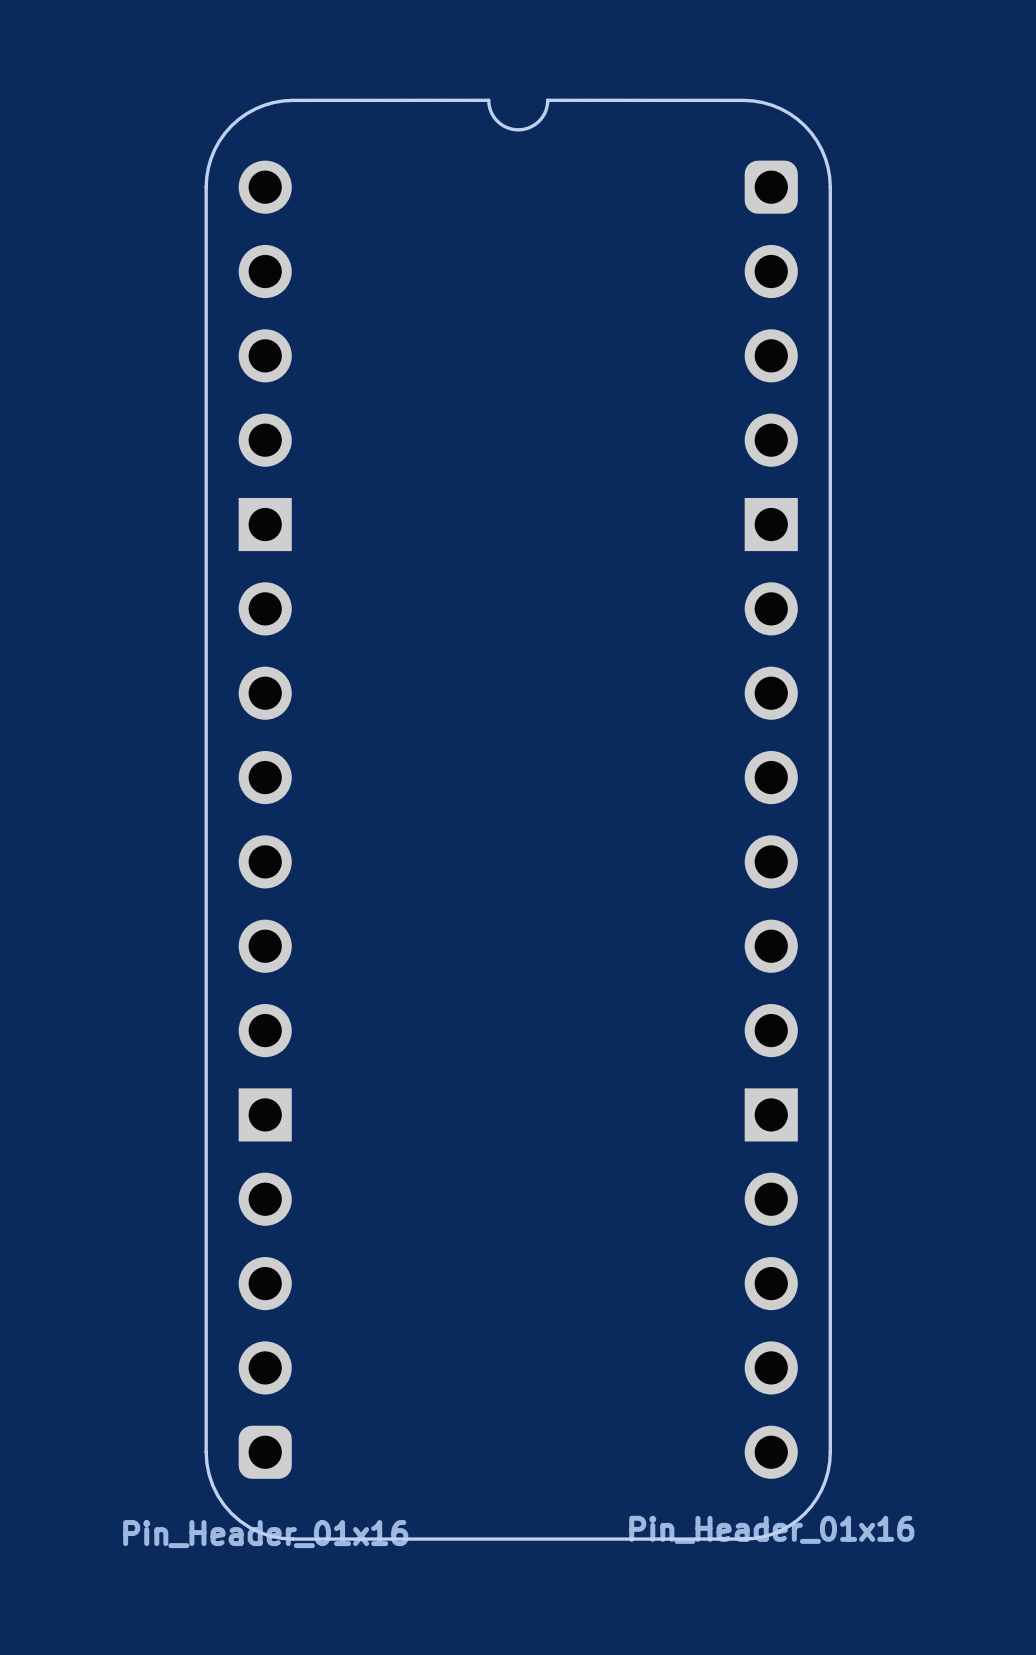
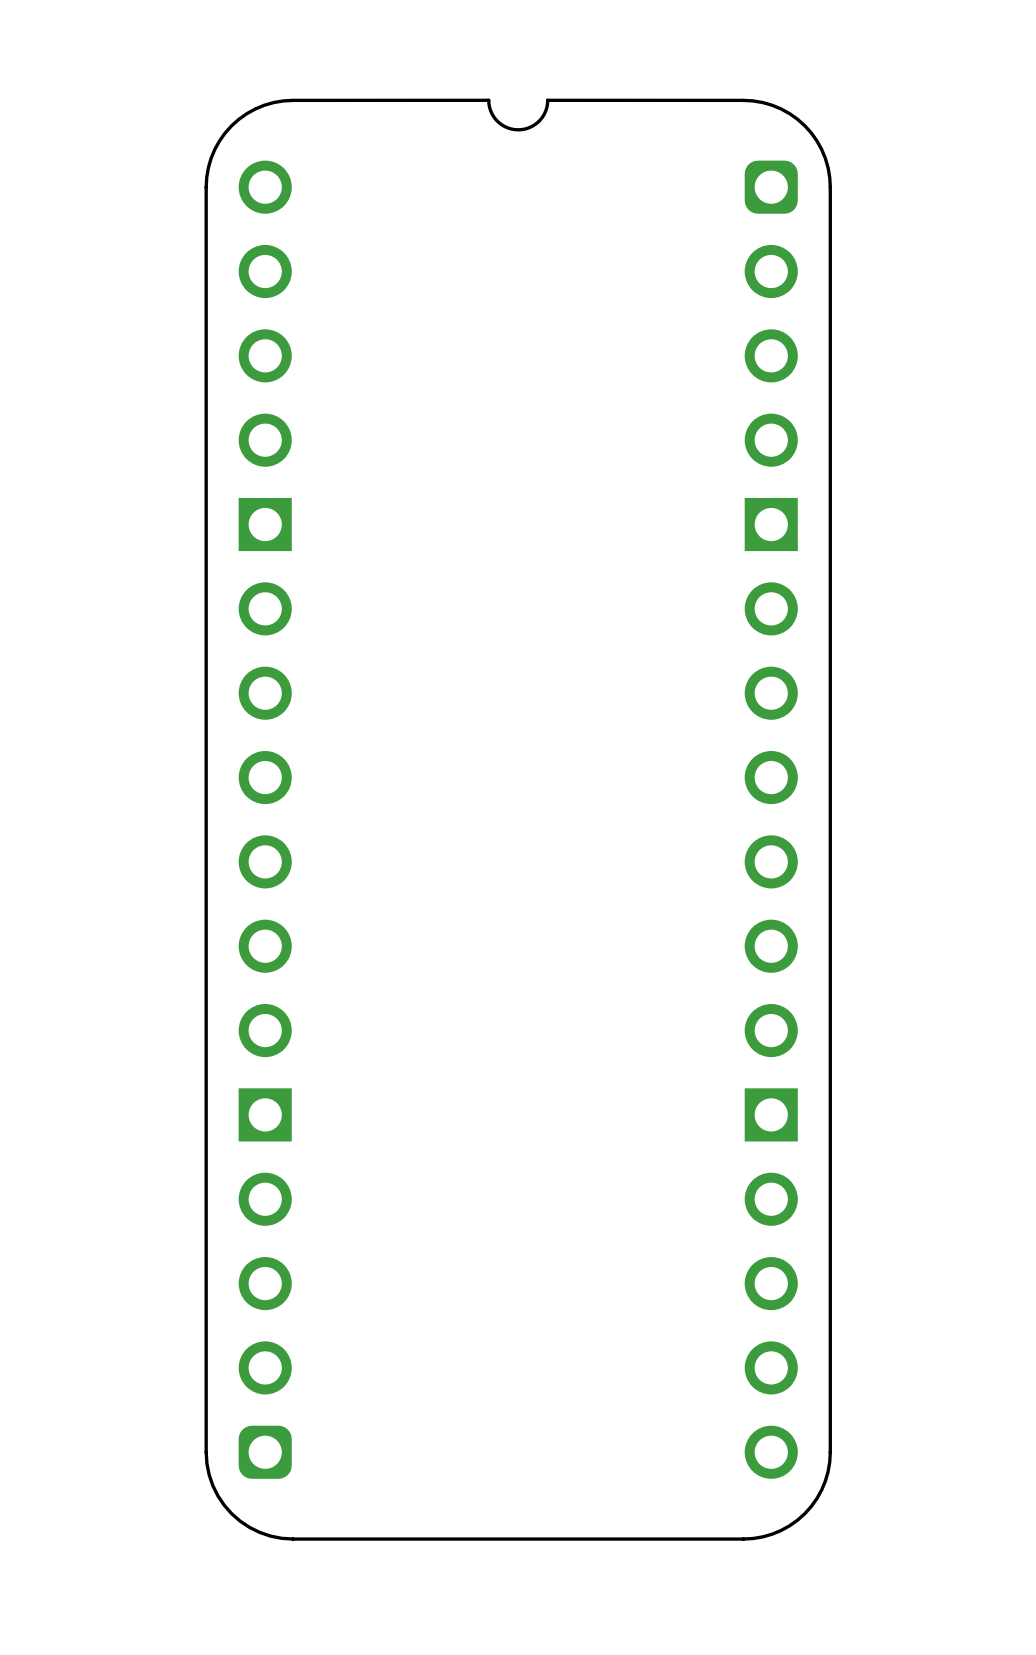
drawing: [629, 1515, 915, 1544] -> none
drawing: [123, 1520, 409, 1549] -> none

